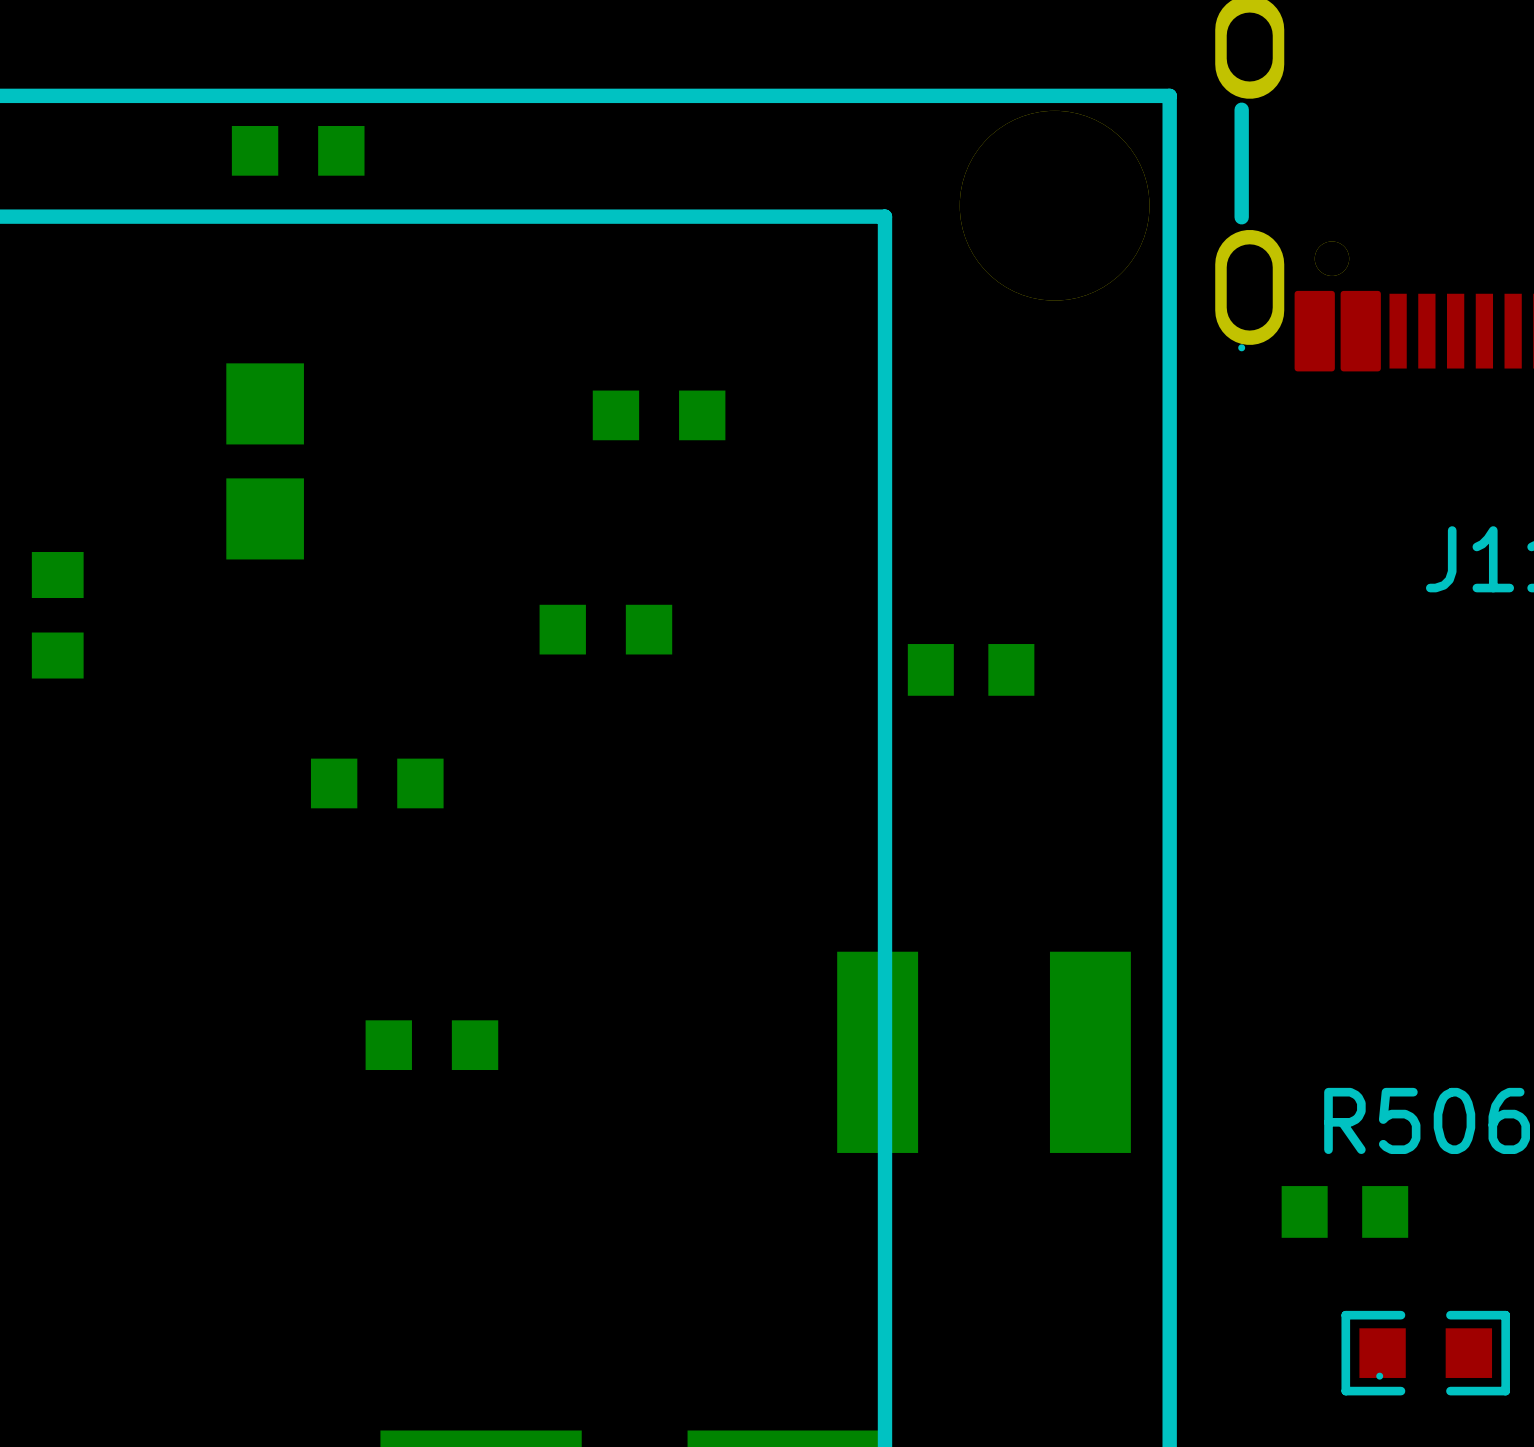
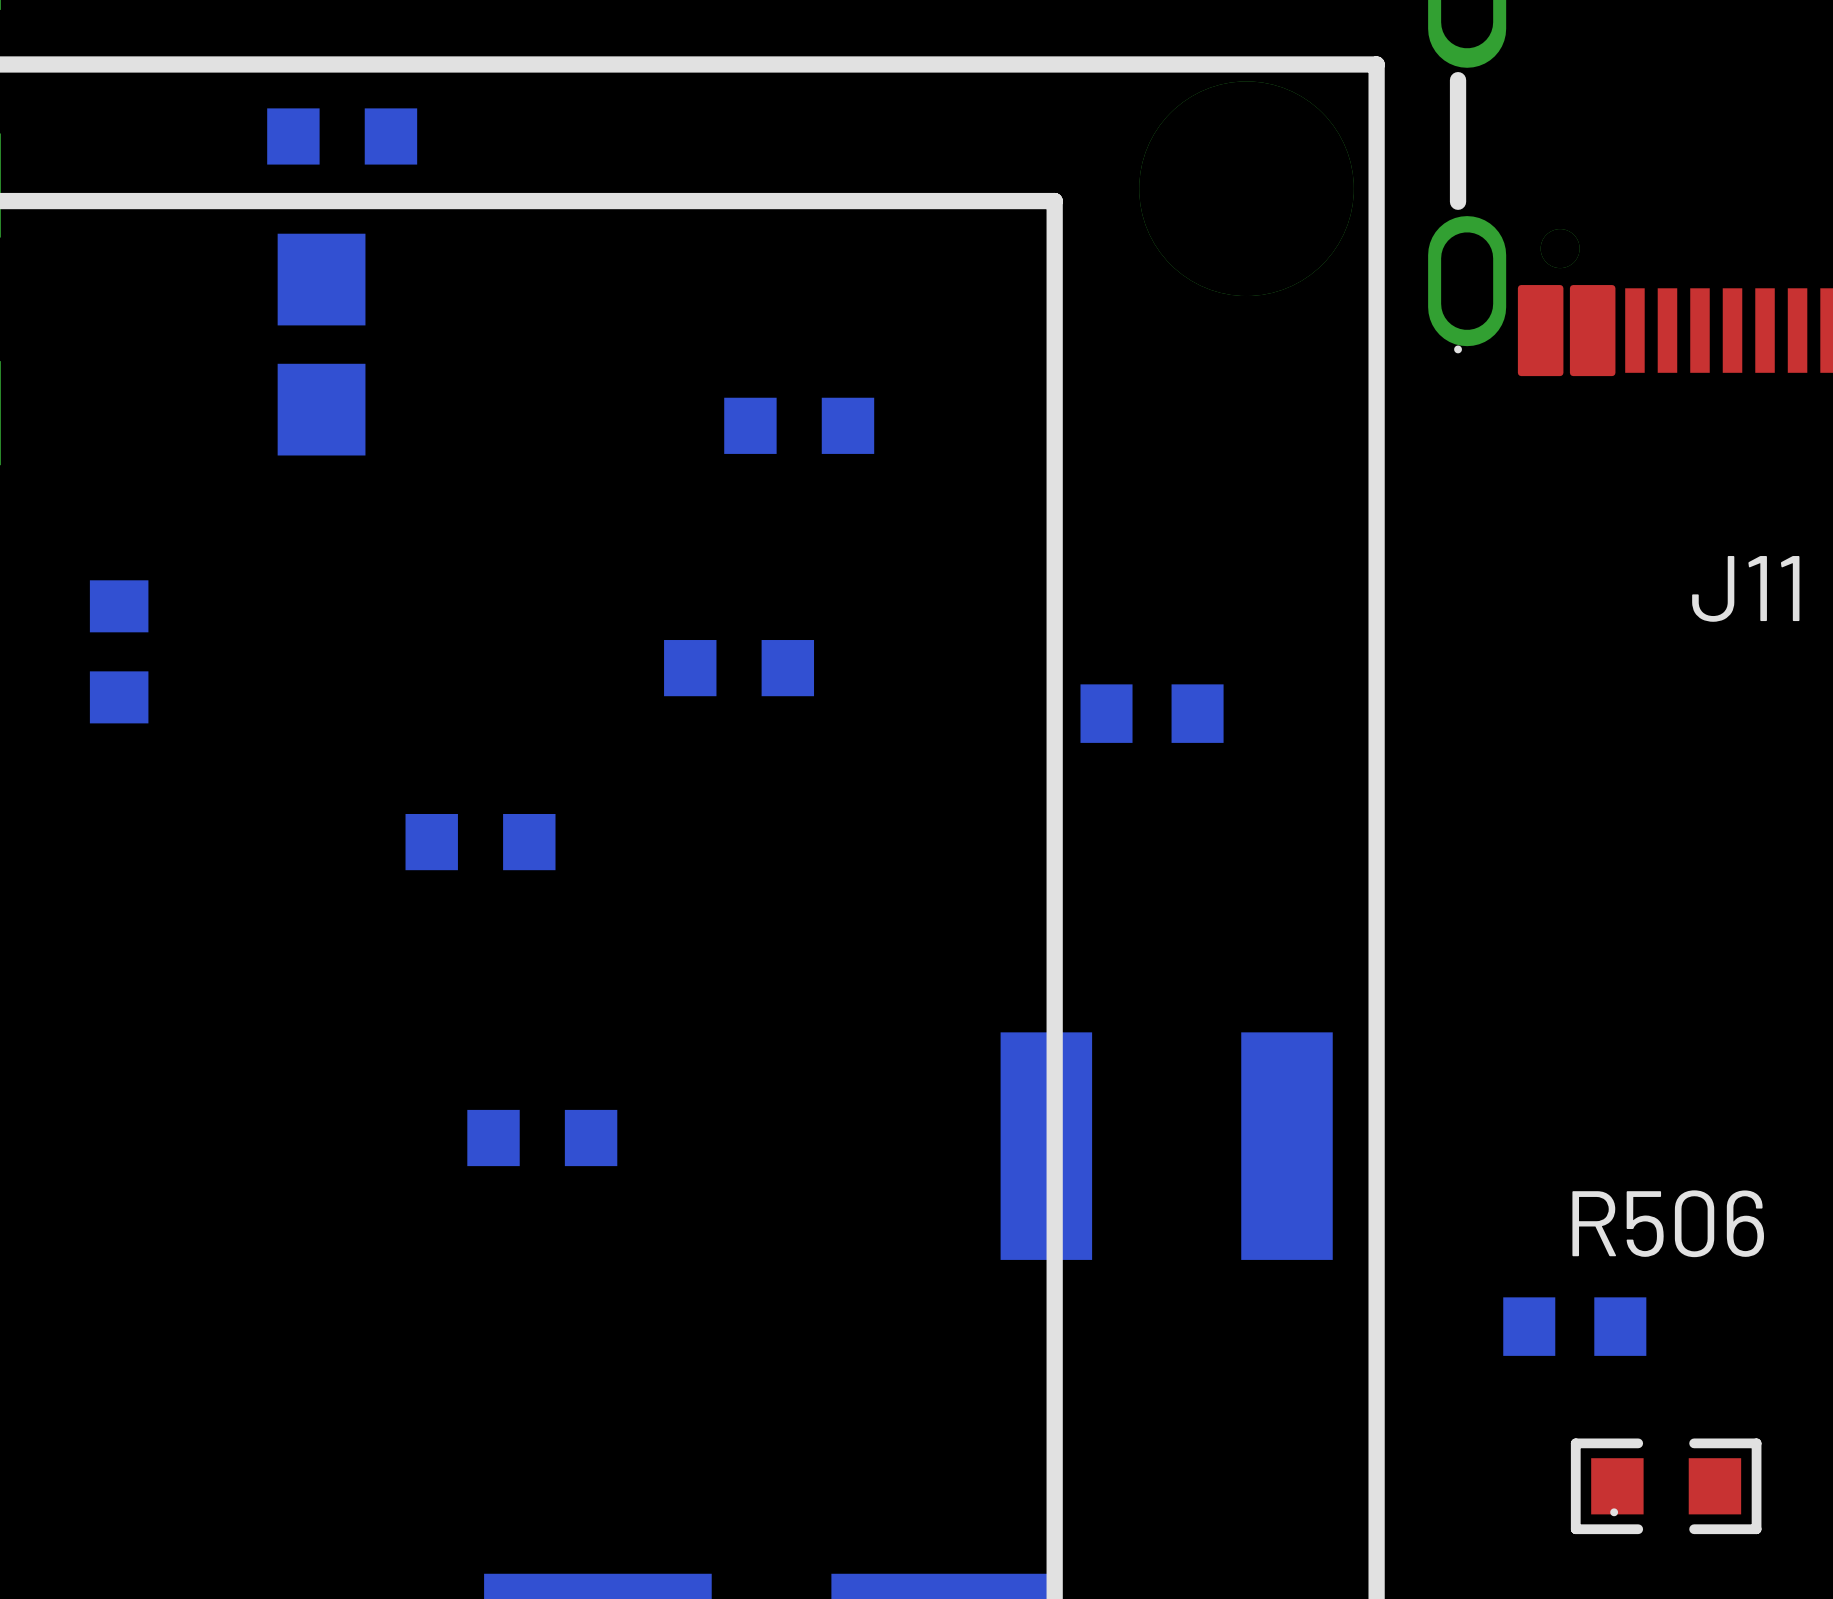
part position: (298, 150) -> (342, 136)
part position: (265, 461) -> (321, 344)

